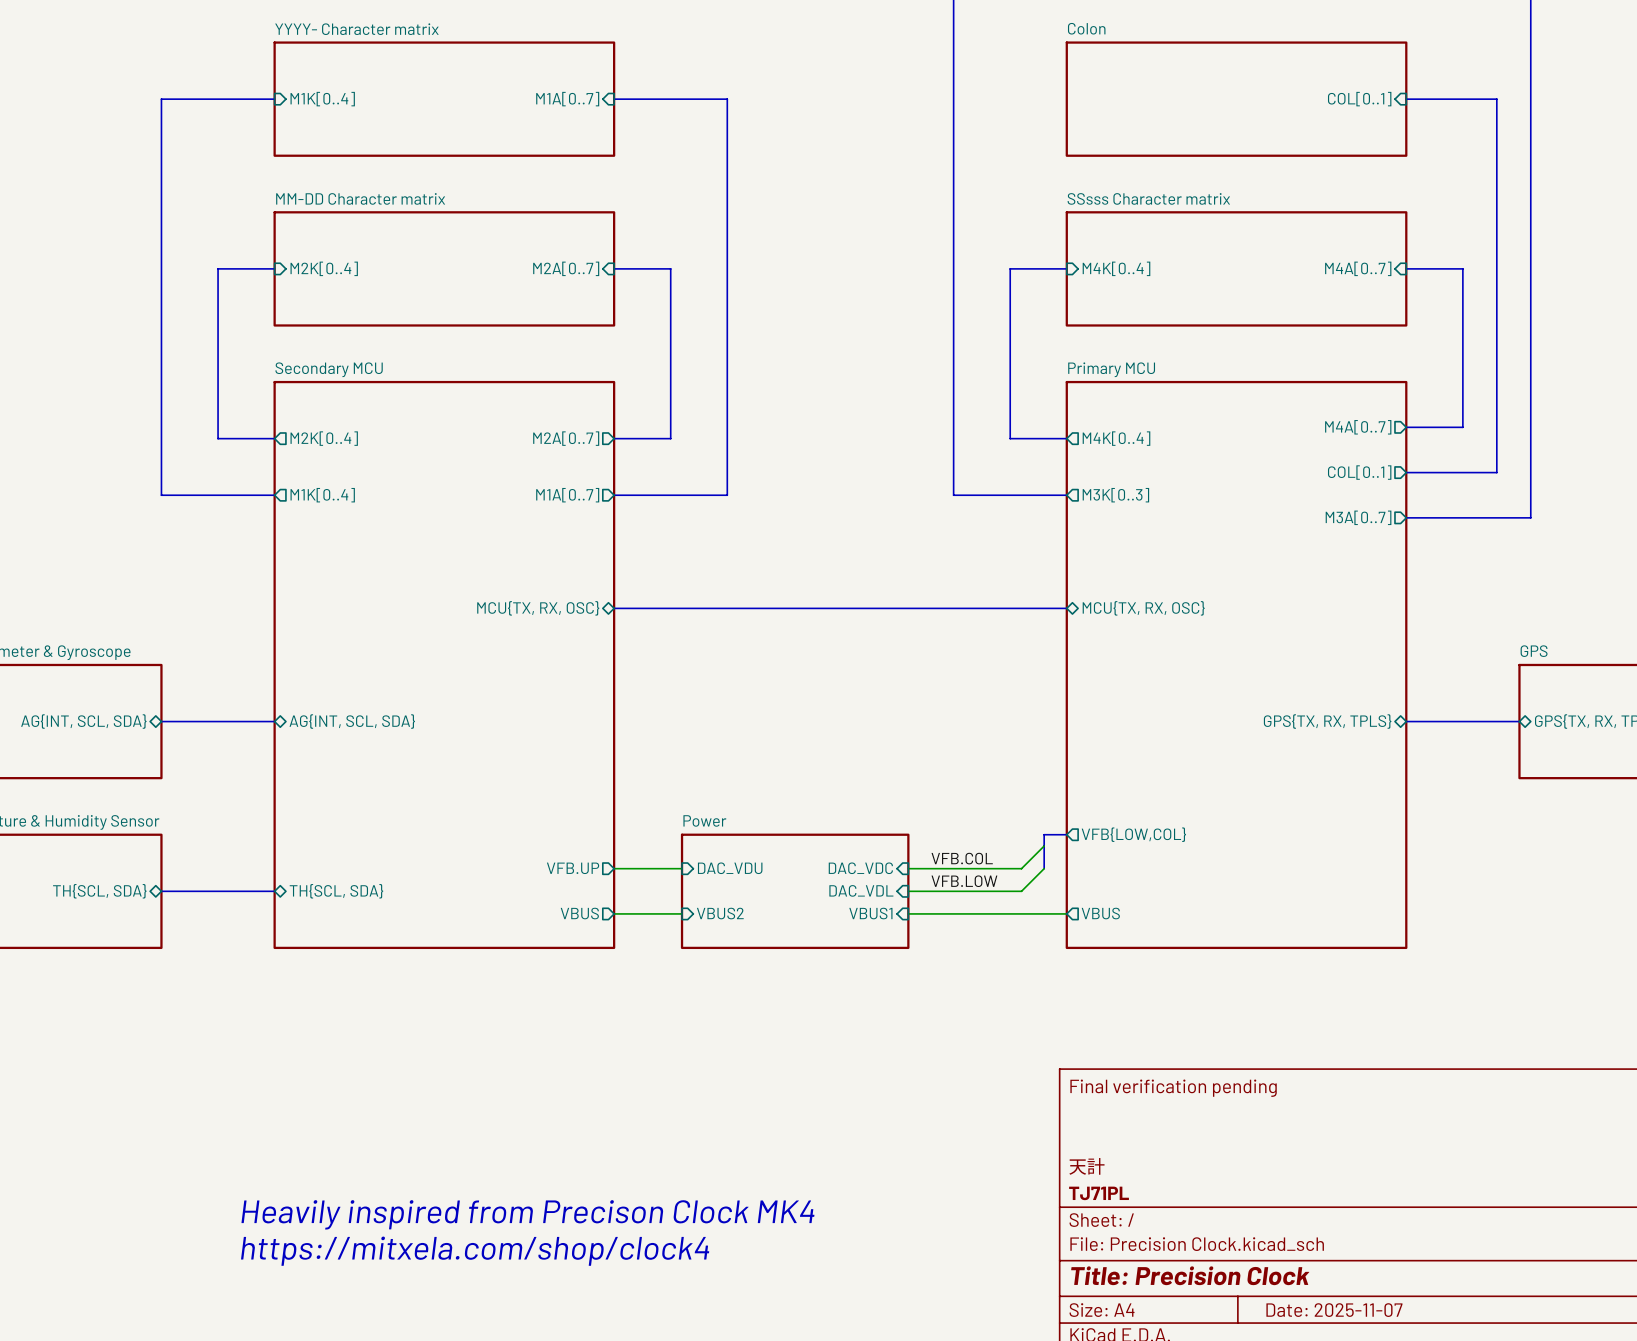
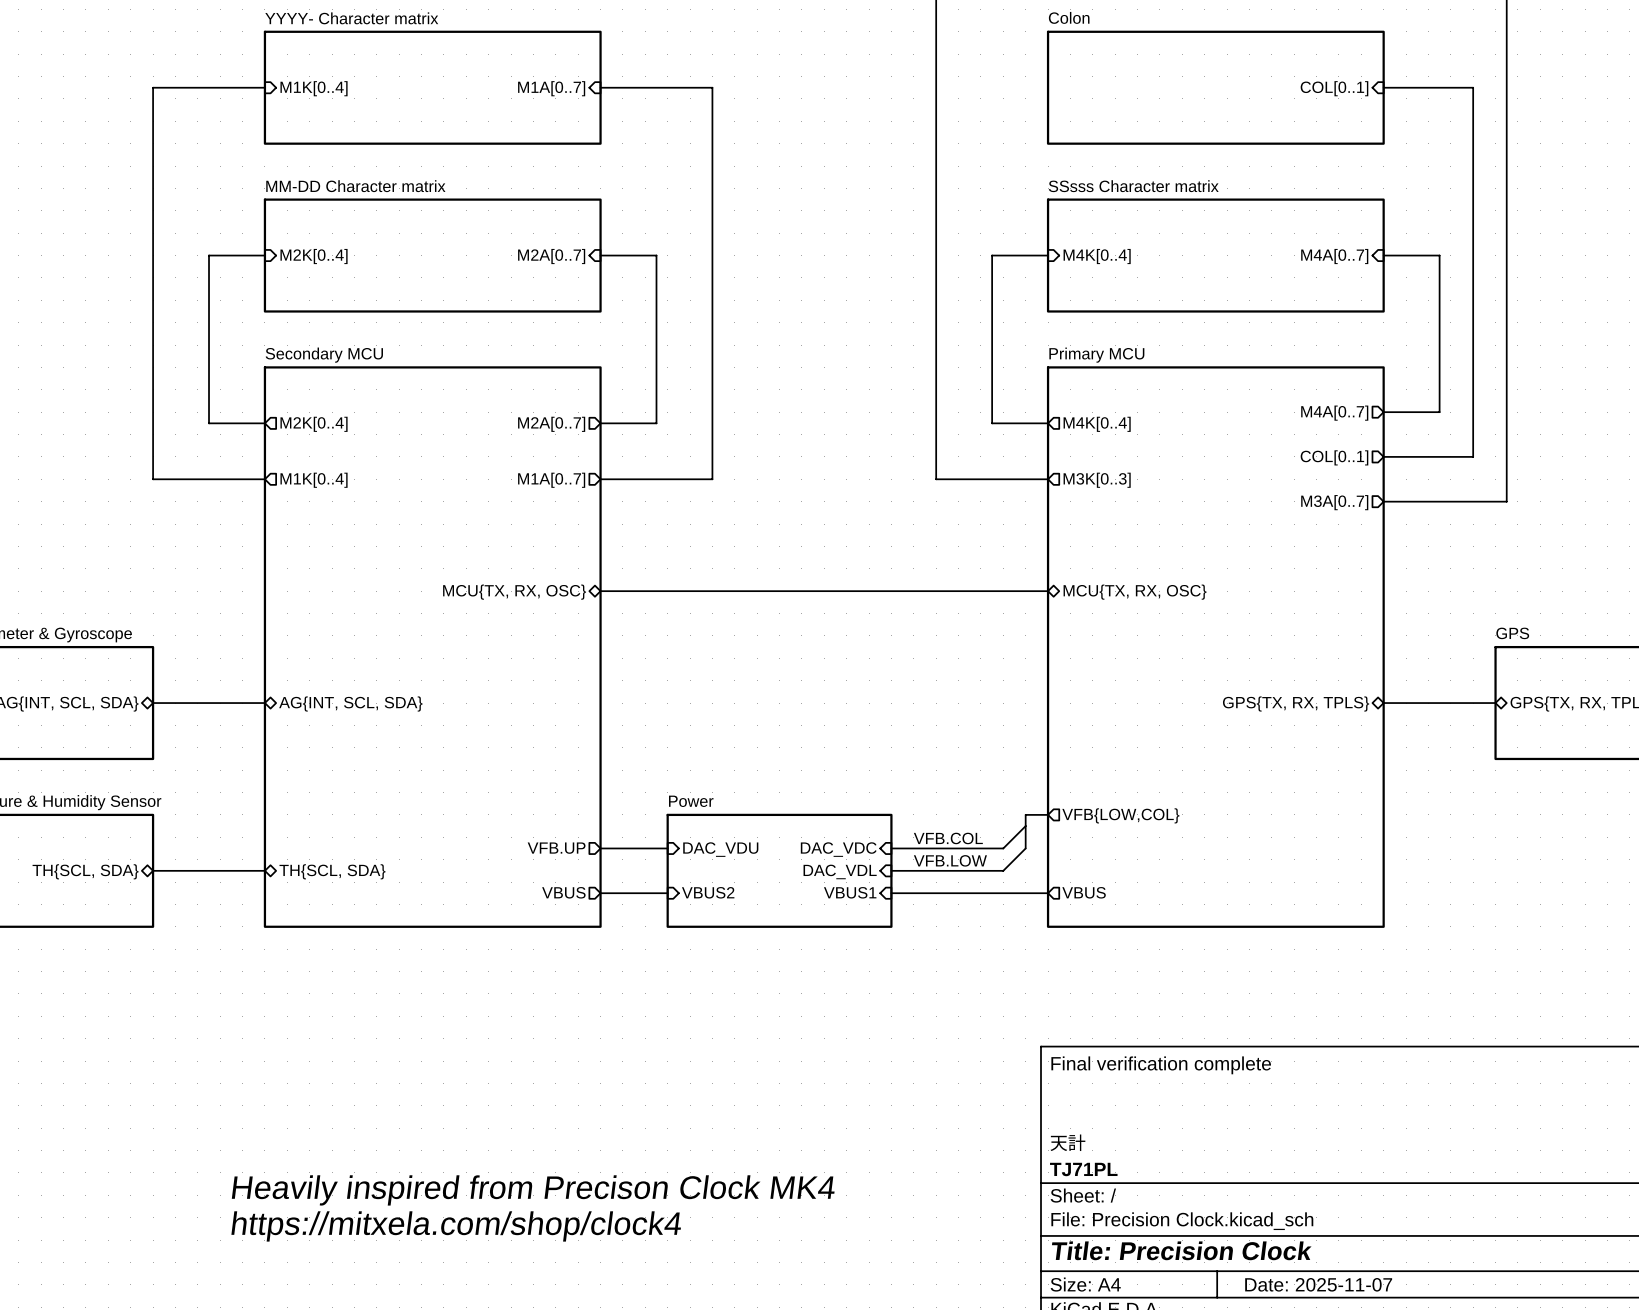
title block: Final verification pending (1173, 1088) -> Final verification complete (1161, 1065)

